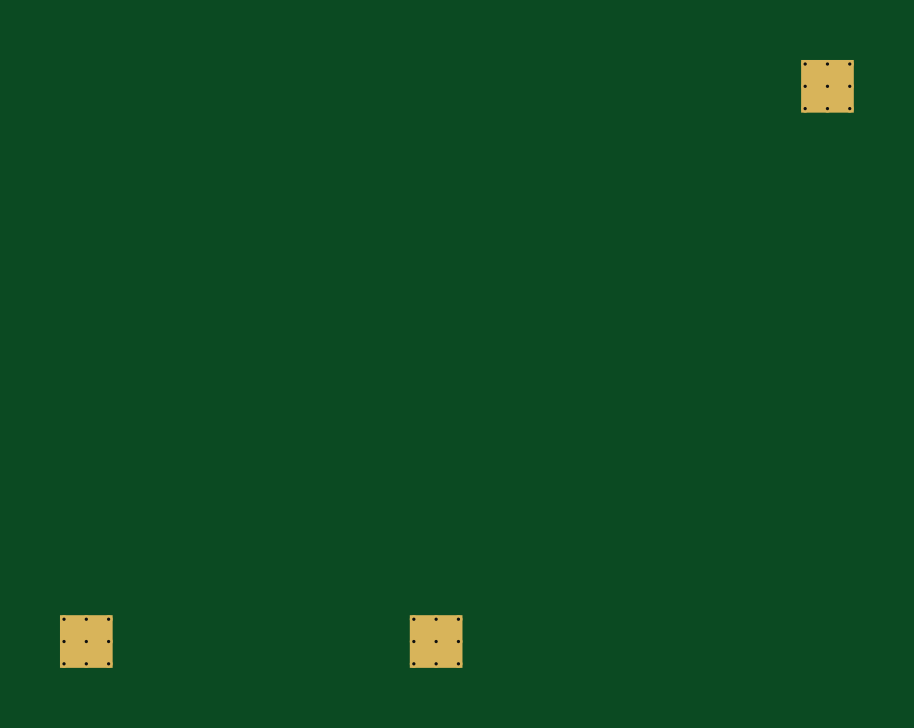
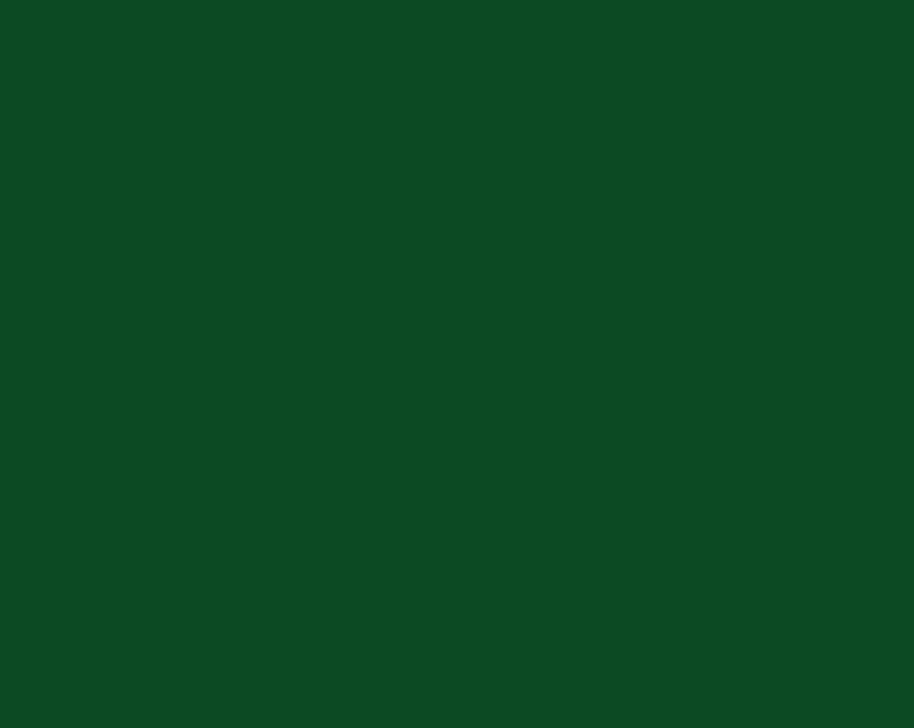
part: (827, 86) -> none
part: (86, 641) -> none
part: (436, 641) -> none

